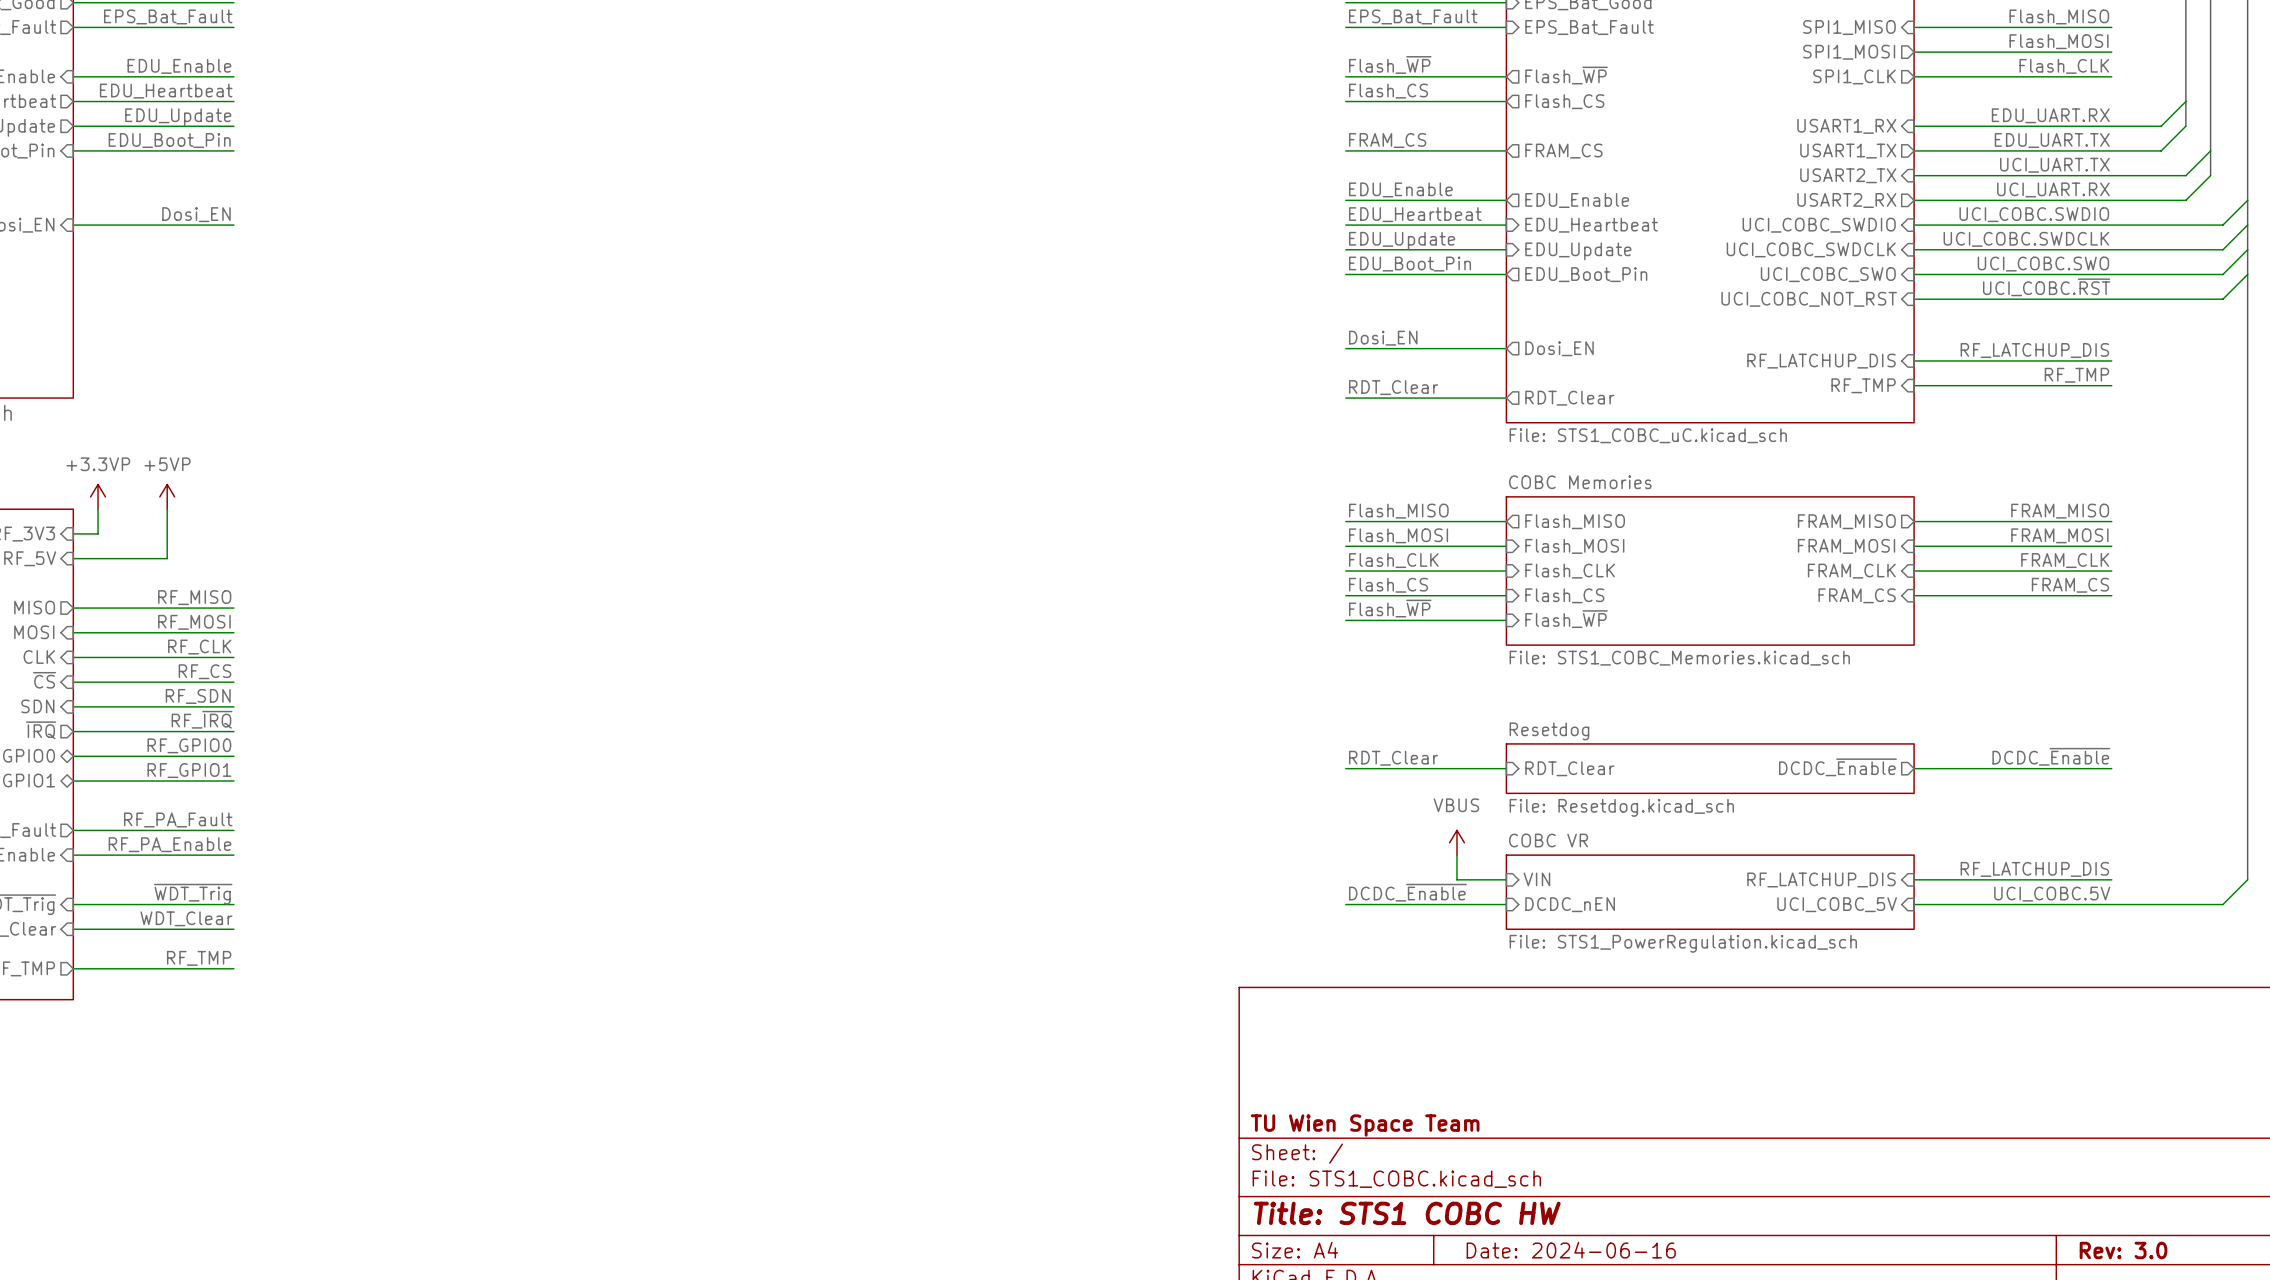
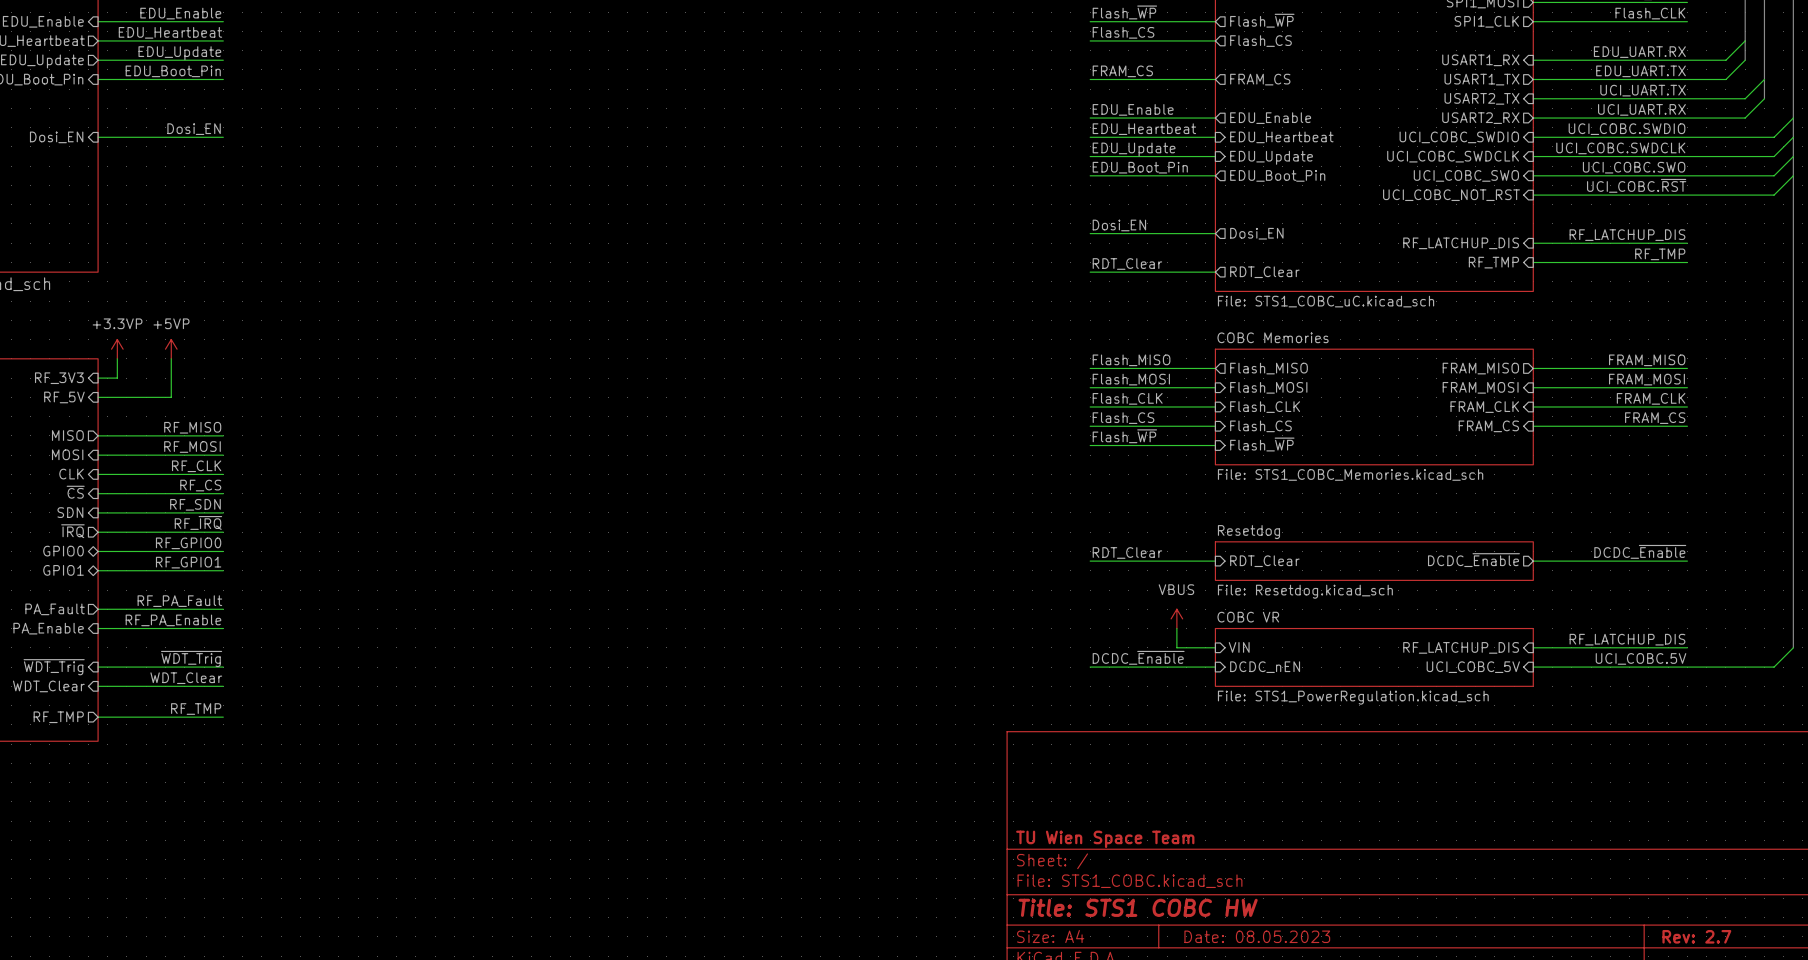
title block: Date: 2024-06-16 (1571, 1250) -> Date: 08.05.2023 (1257, 936)
title block: Rev: 3.0 (2123, 1250) -> Rev: 2.7 (1696, 936)

